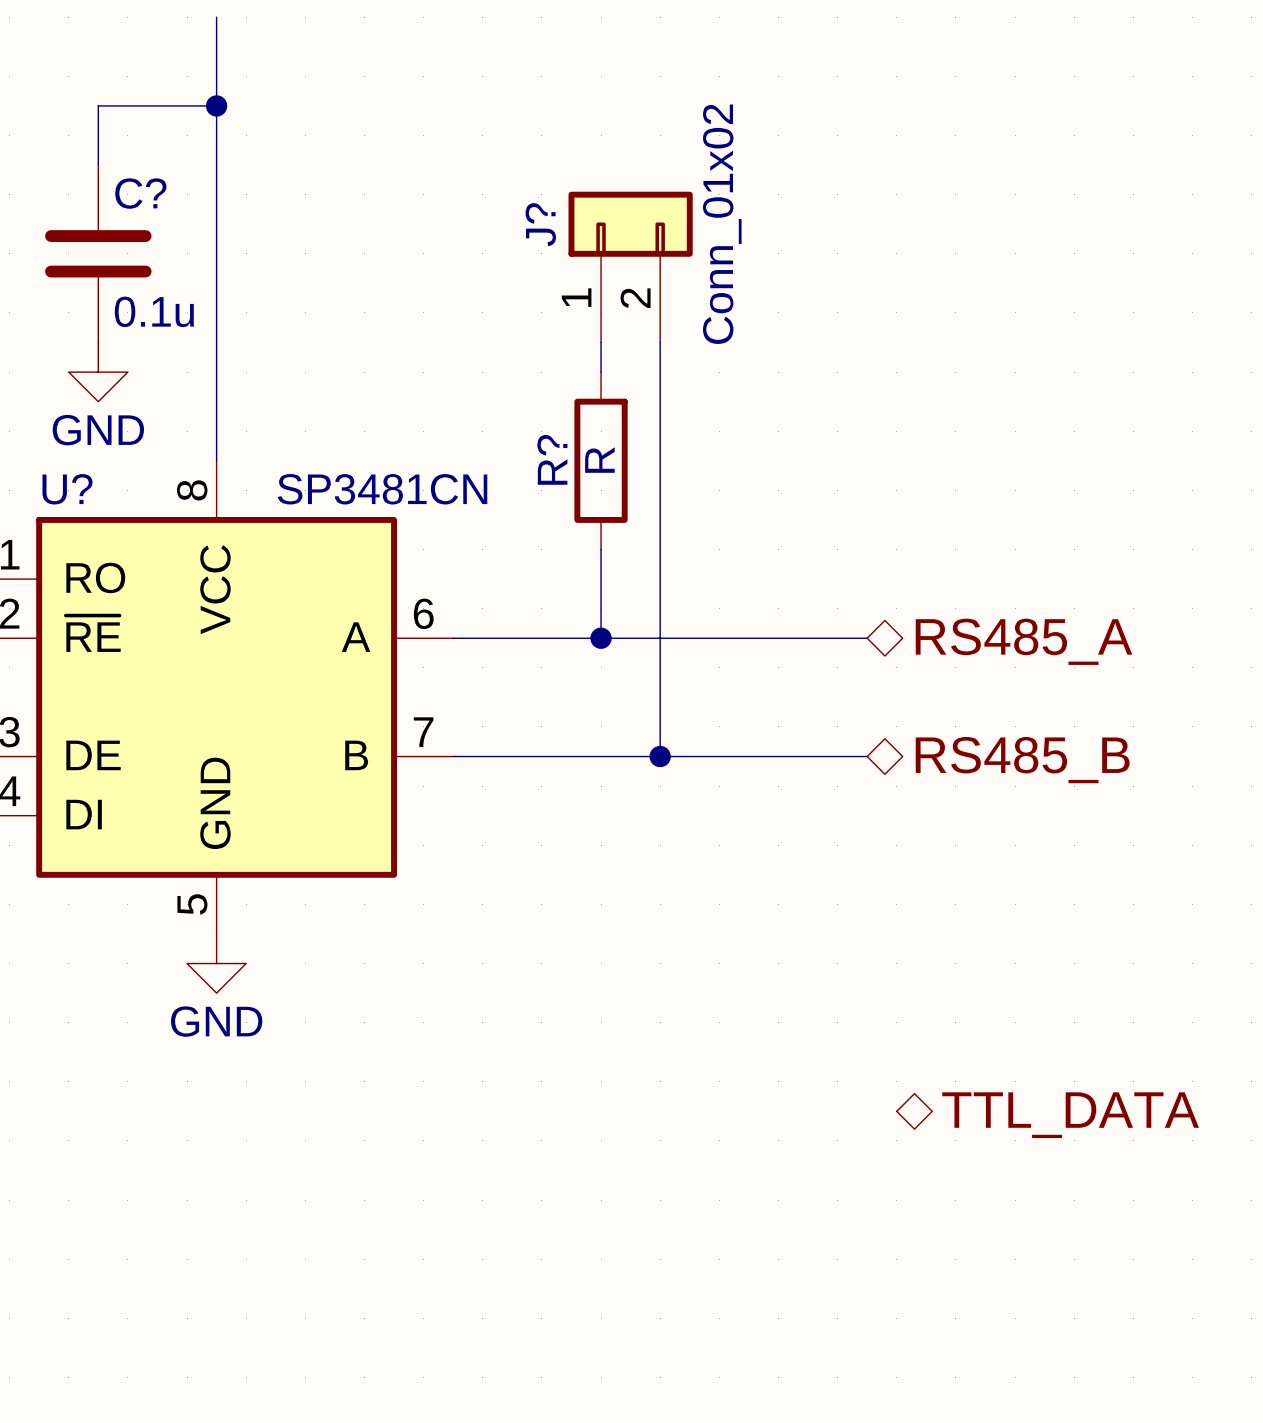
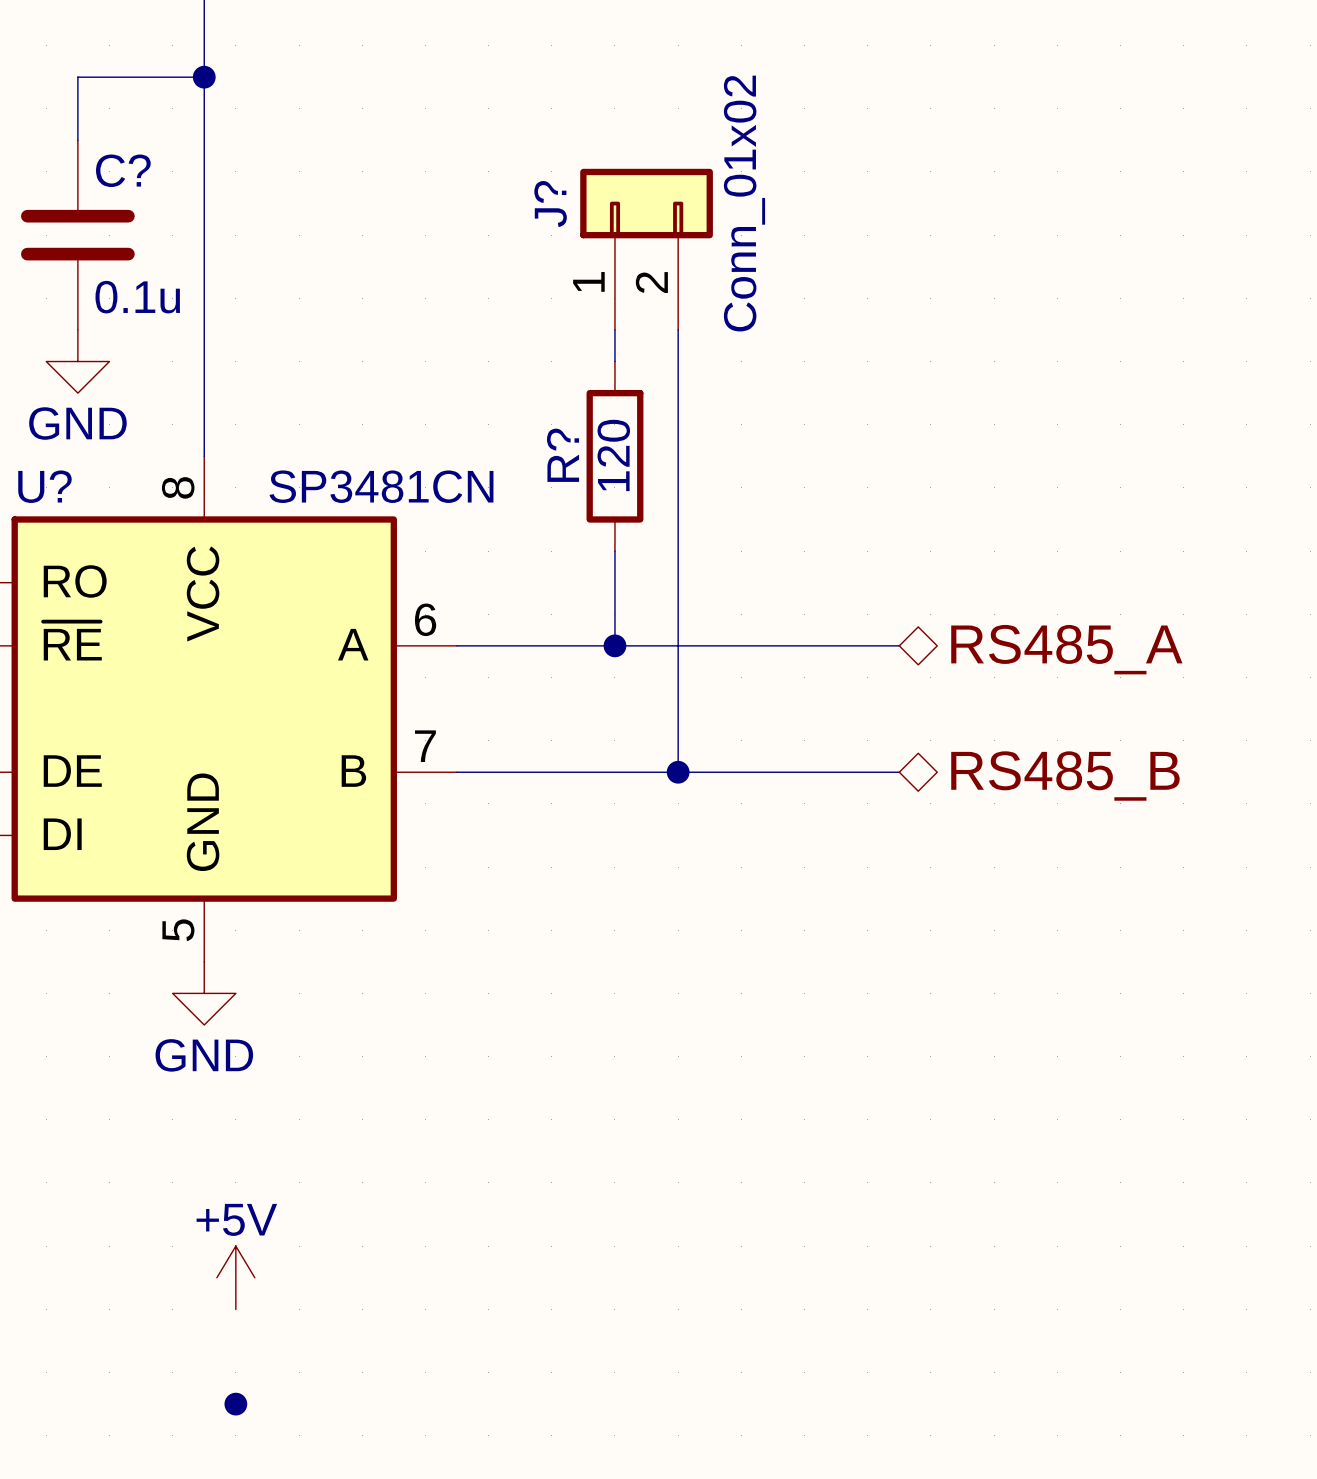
R? value: R (599, 460) -> 120 (613, 455)
hierarchical label: TTL_DATA (1070, 1115) -> none
power symbol: none -> +5V (235, 1277)
junction: none -> (235, 1404)

